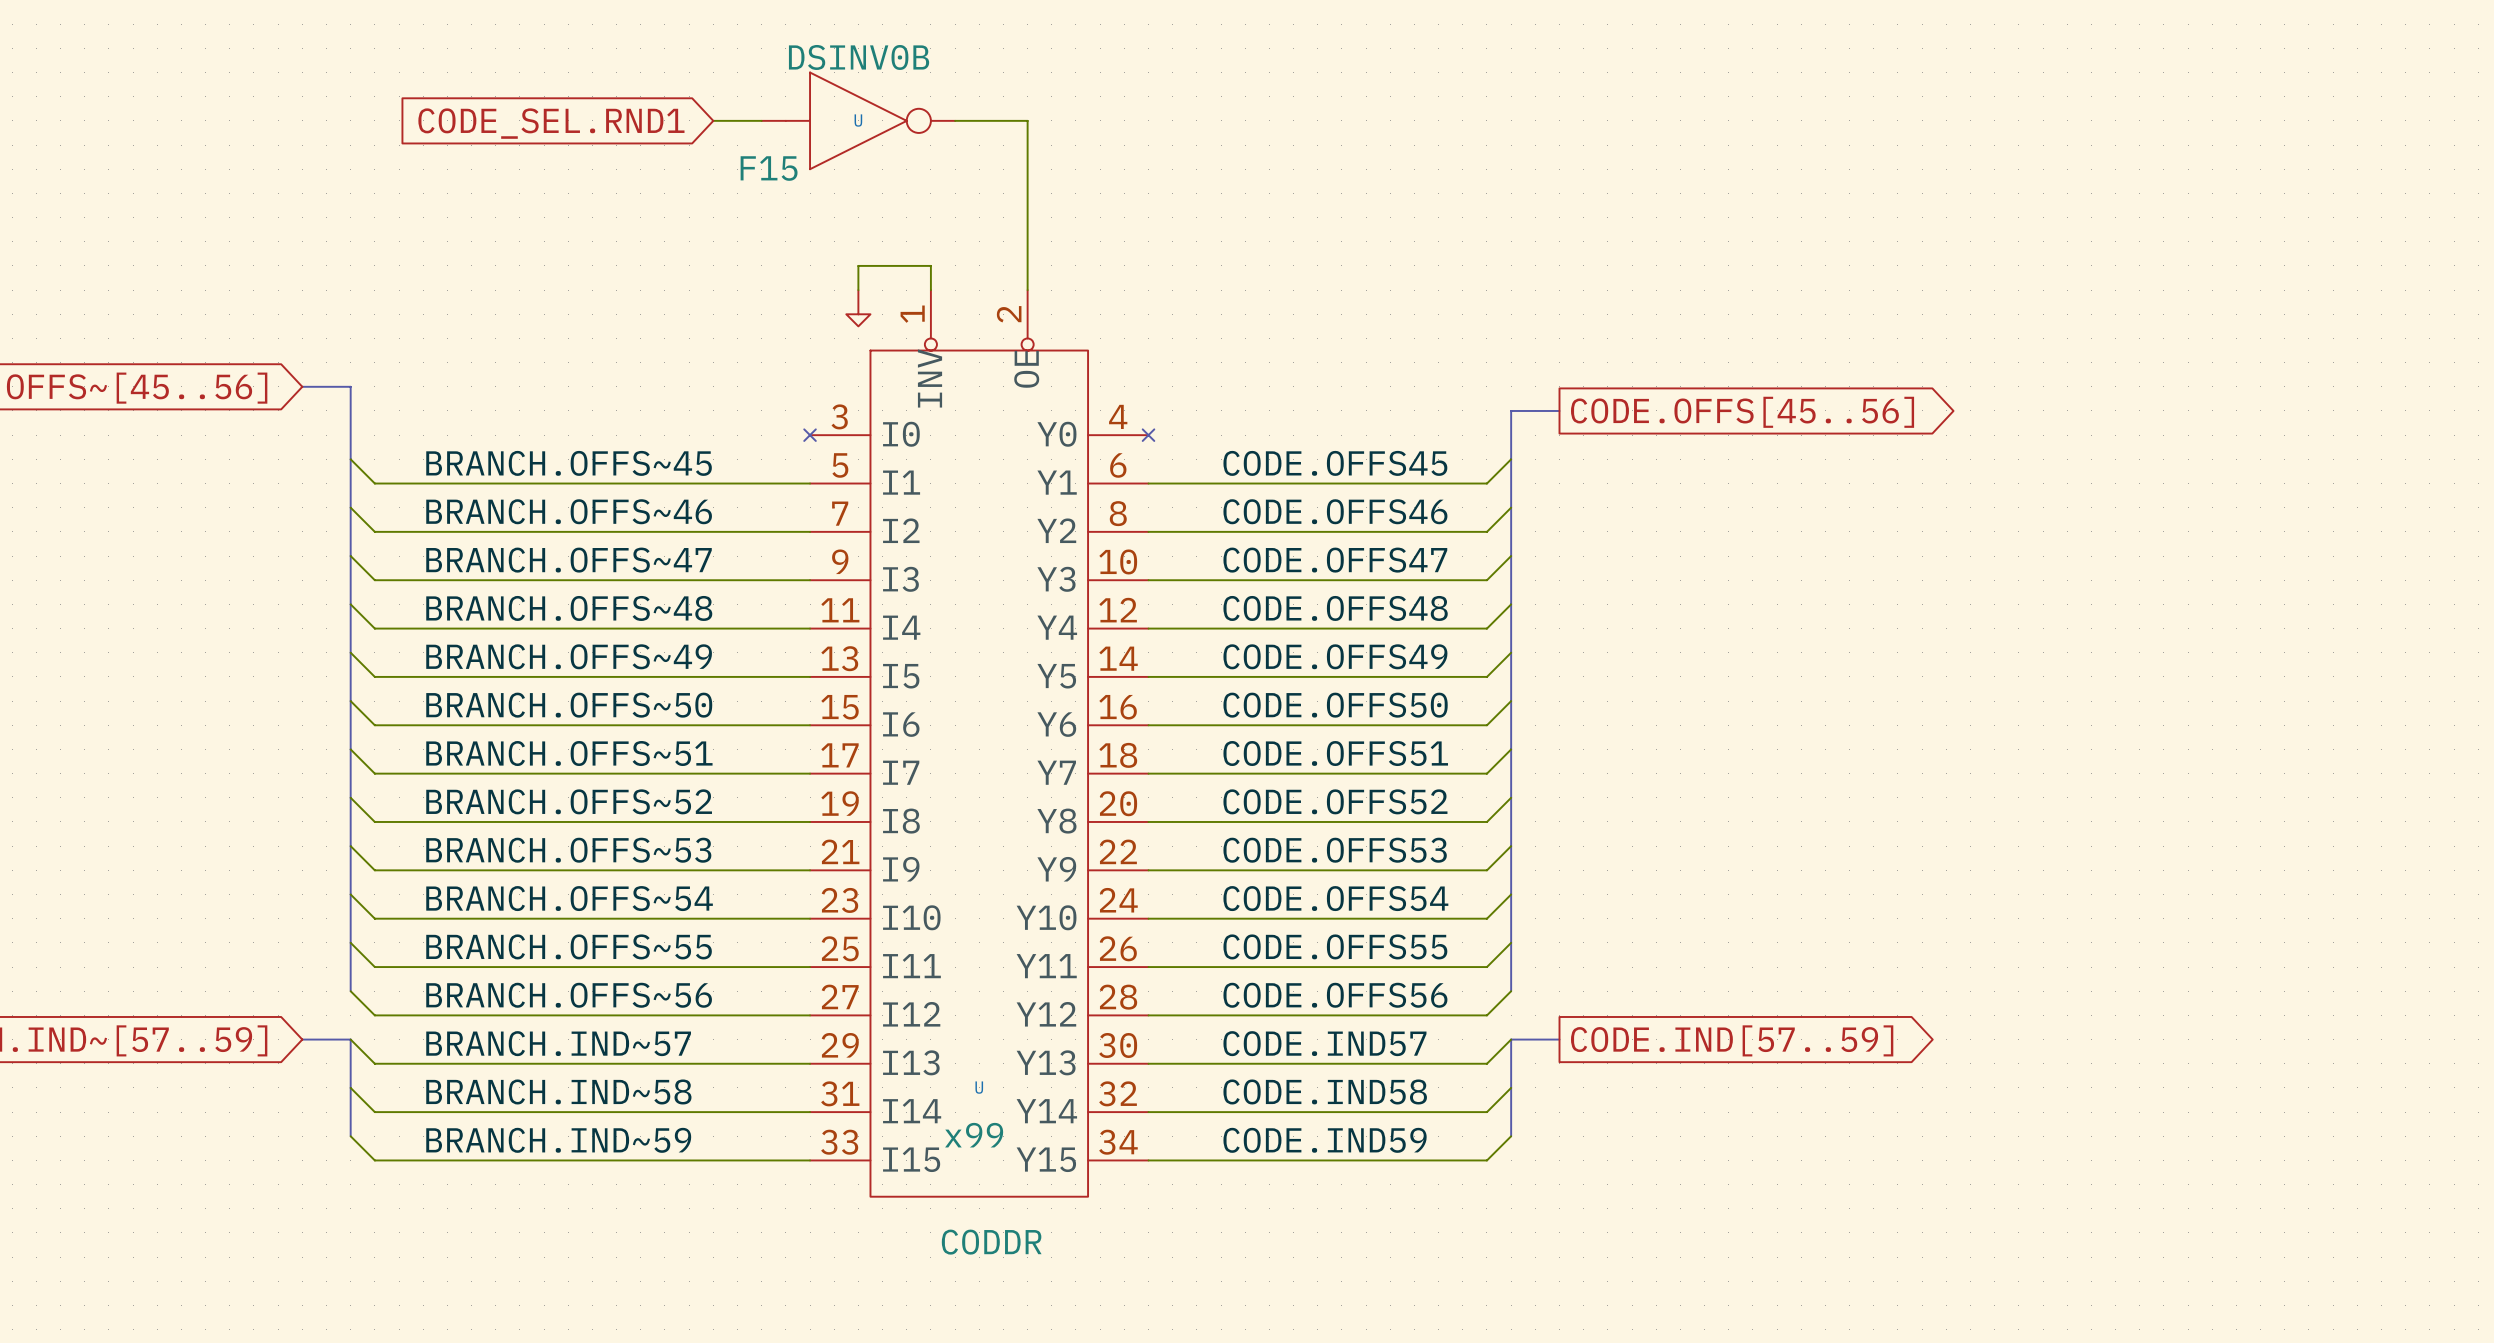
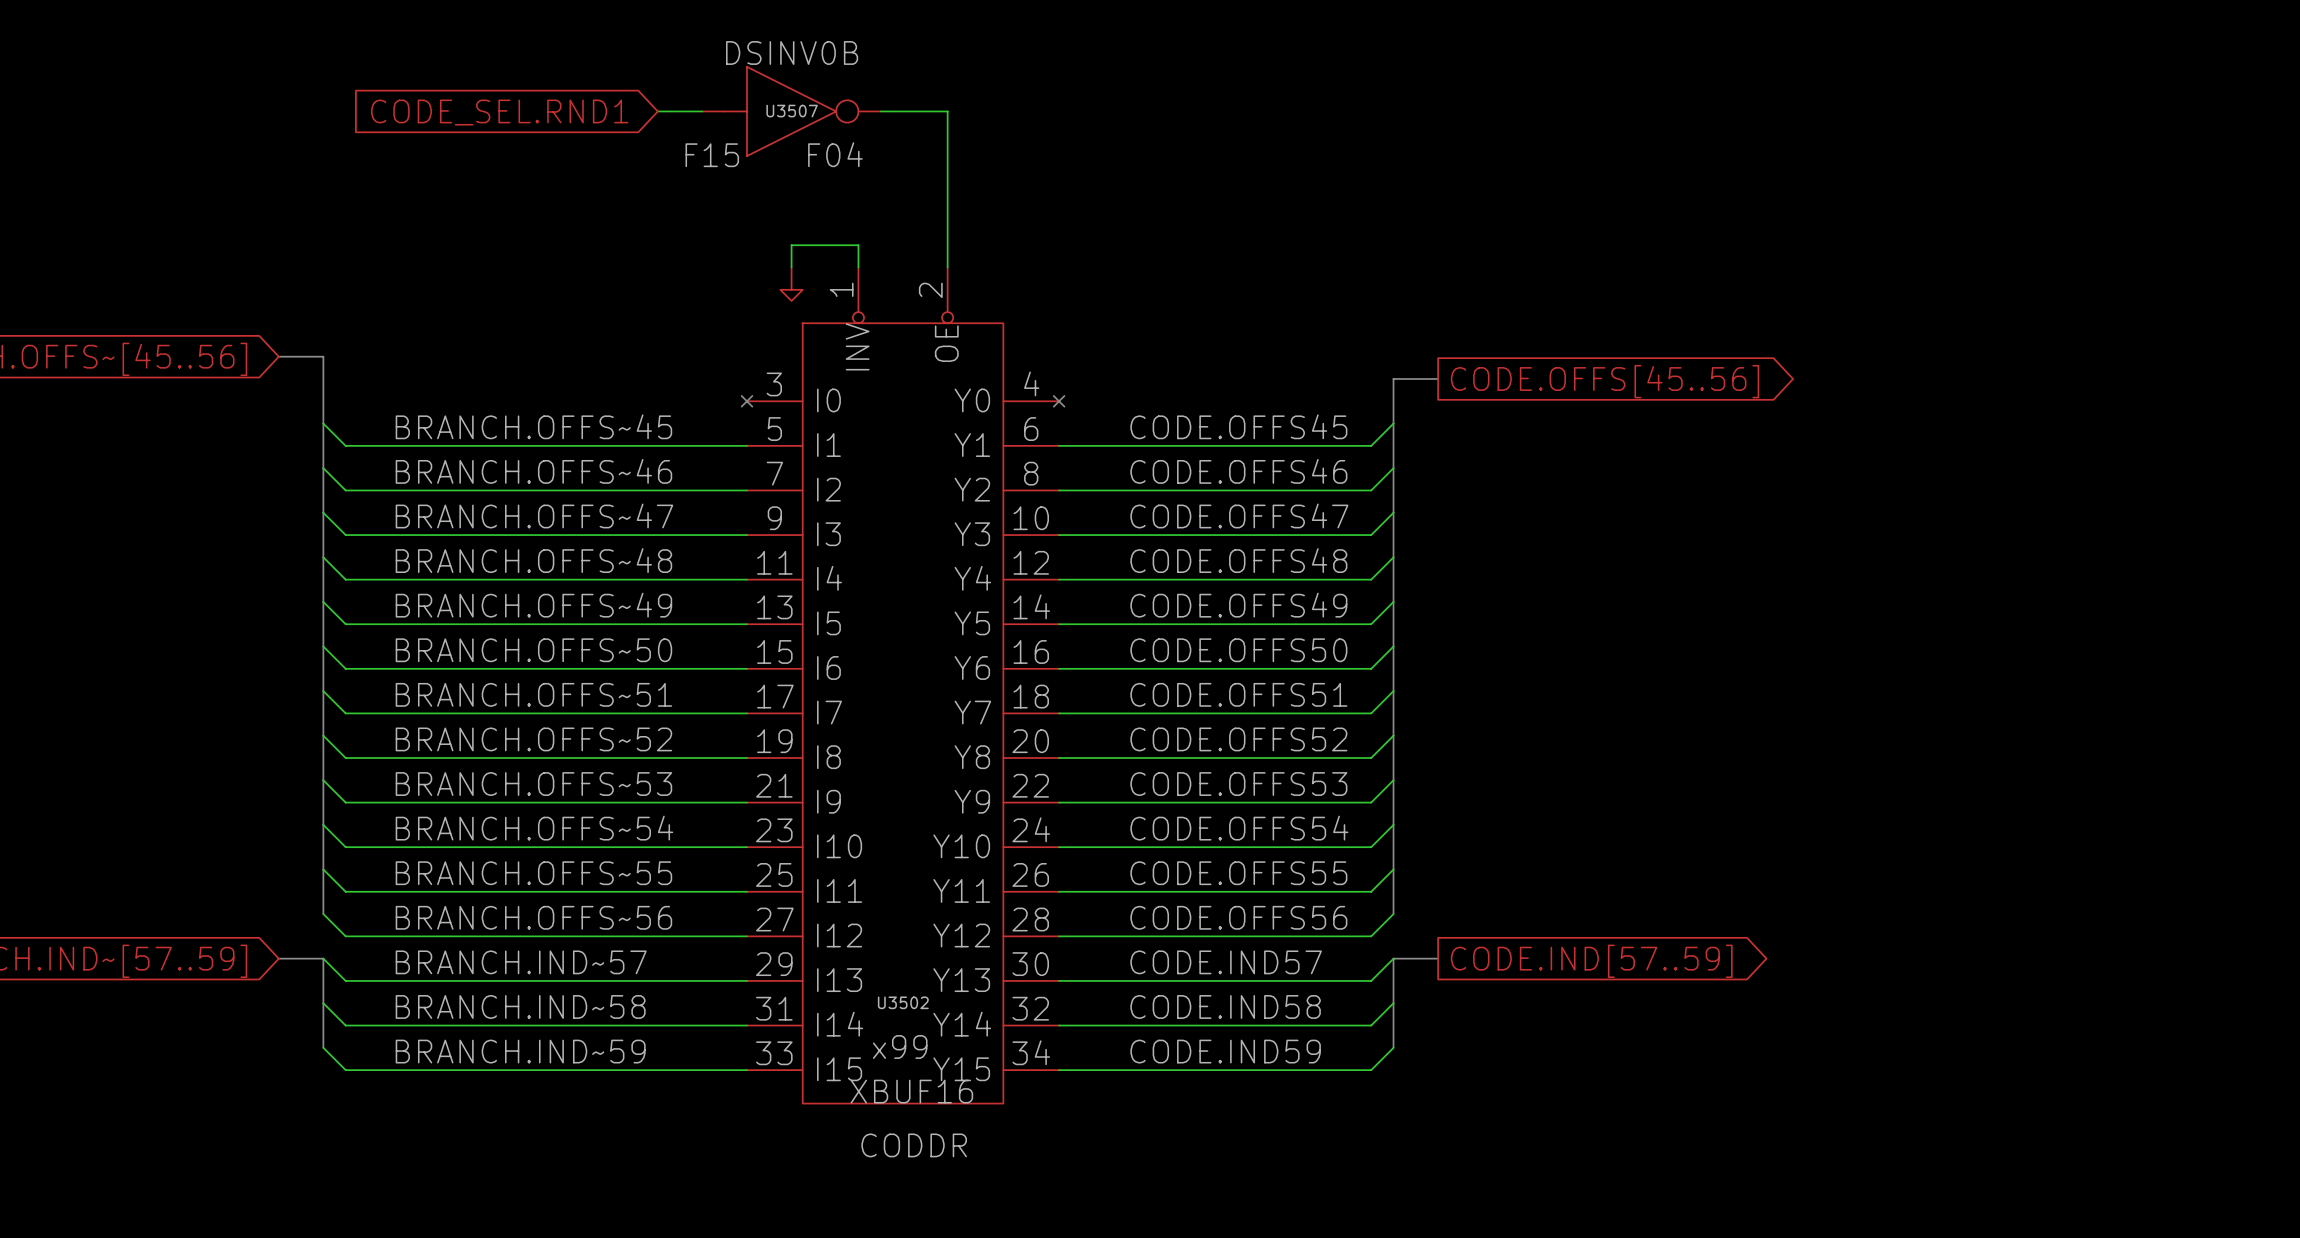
U name: U (858, 120) -> U3507 (792, 111)
U value: none -> F04 (835, 154)
U name: U (979, 1087) -> U3502 (903, 1002)
U value: none -> XBUF16 (911, 1091)

